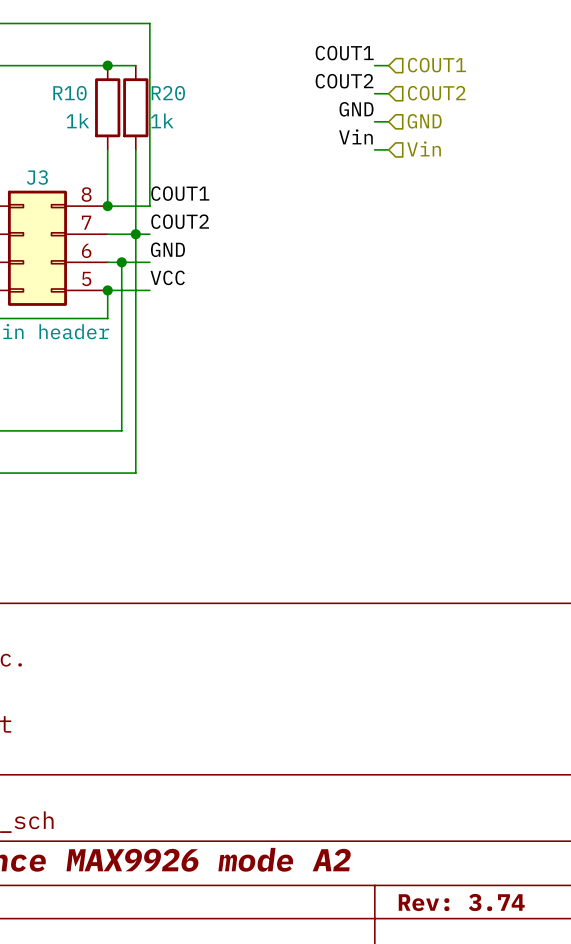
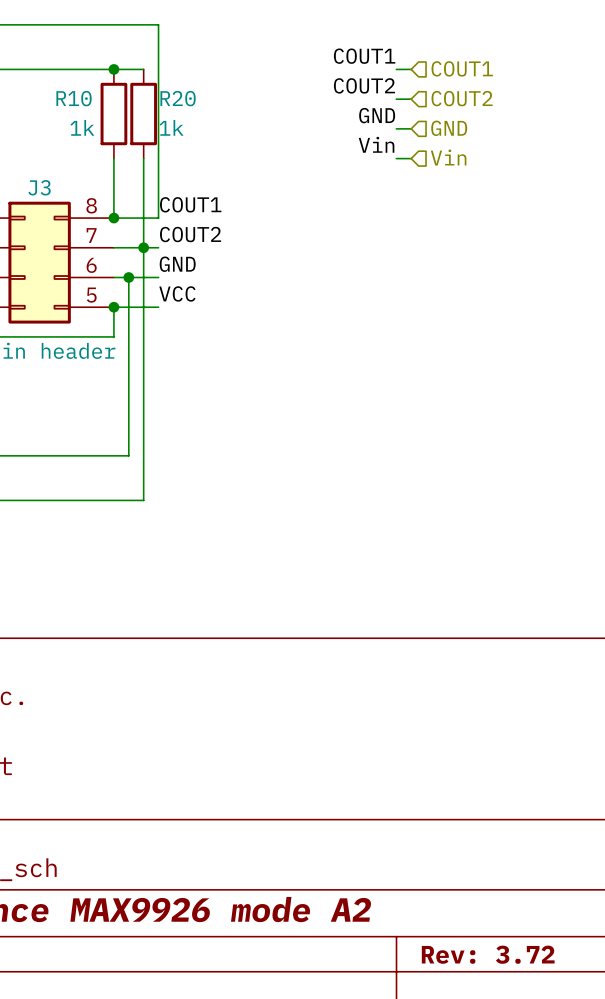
title block: Rev: 3.74 (461, 902) -> Rev: 3.72 (488, 954)

